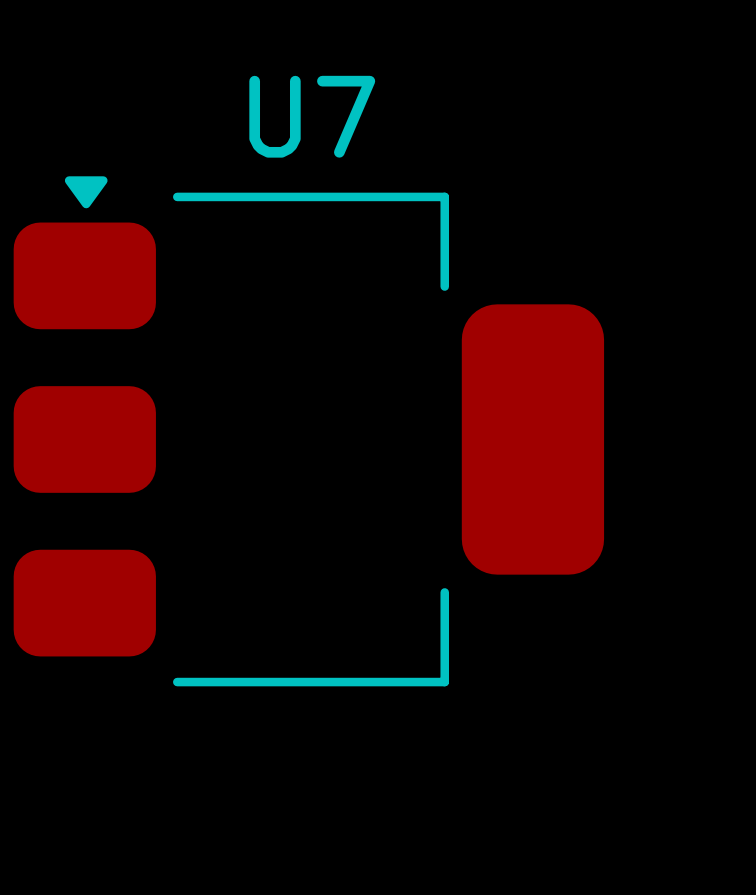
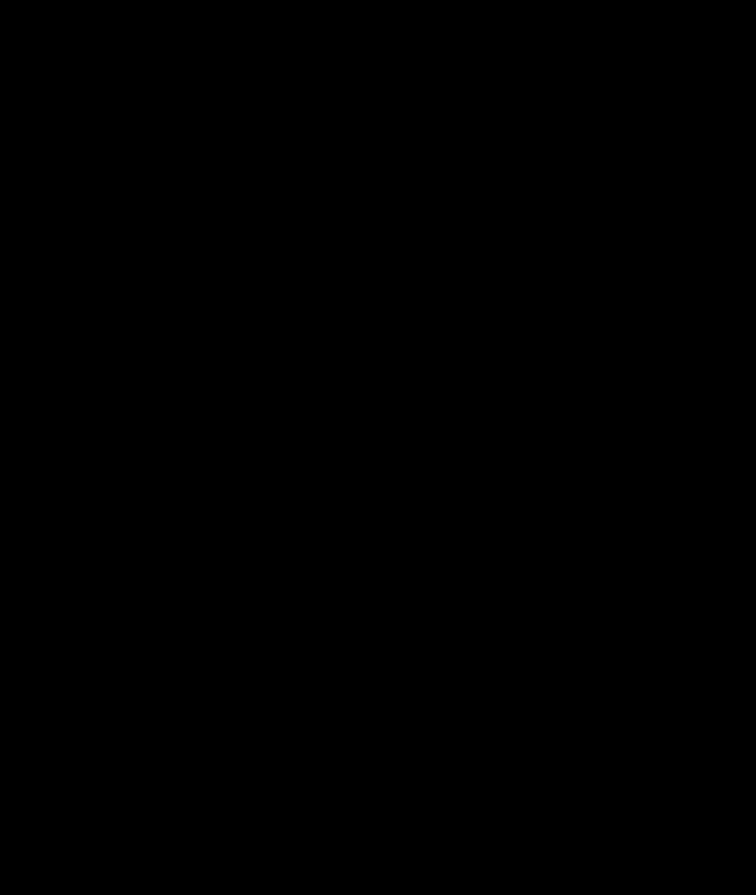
U7: (308, 431) -> none

